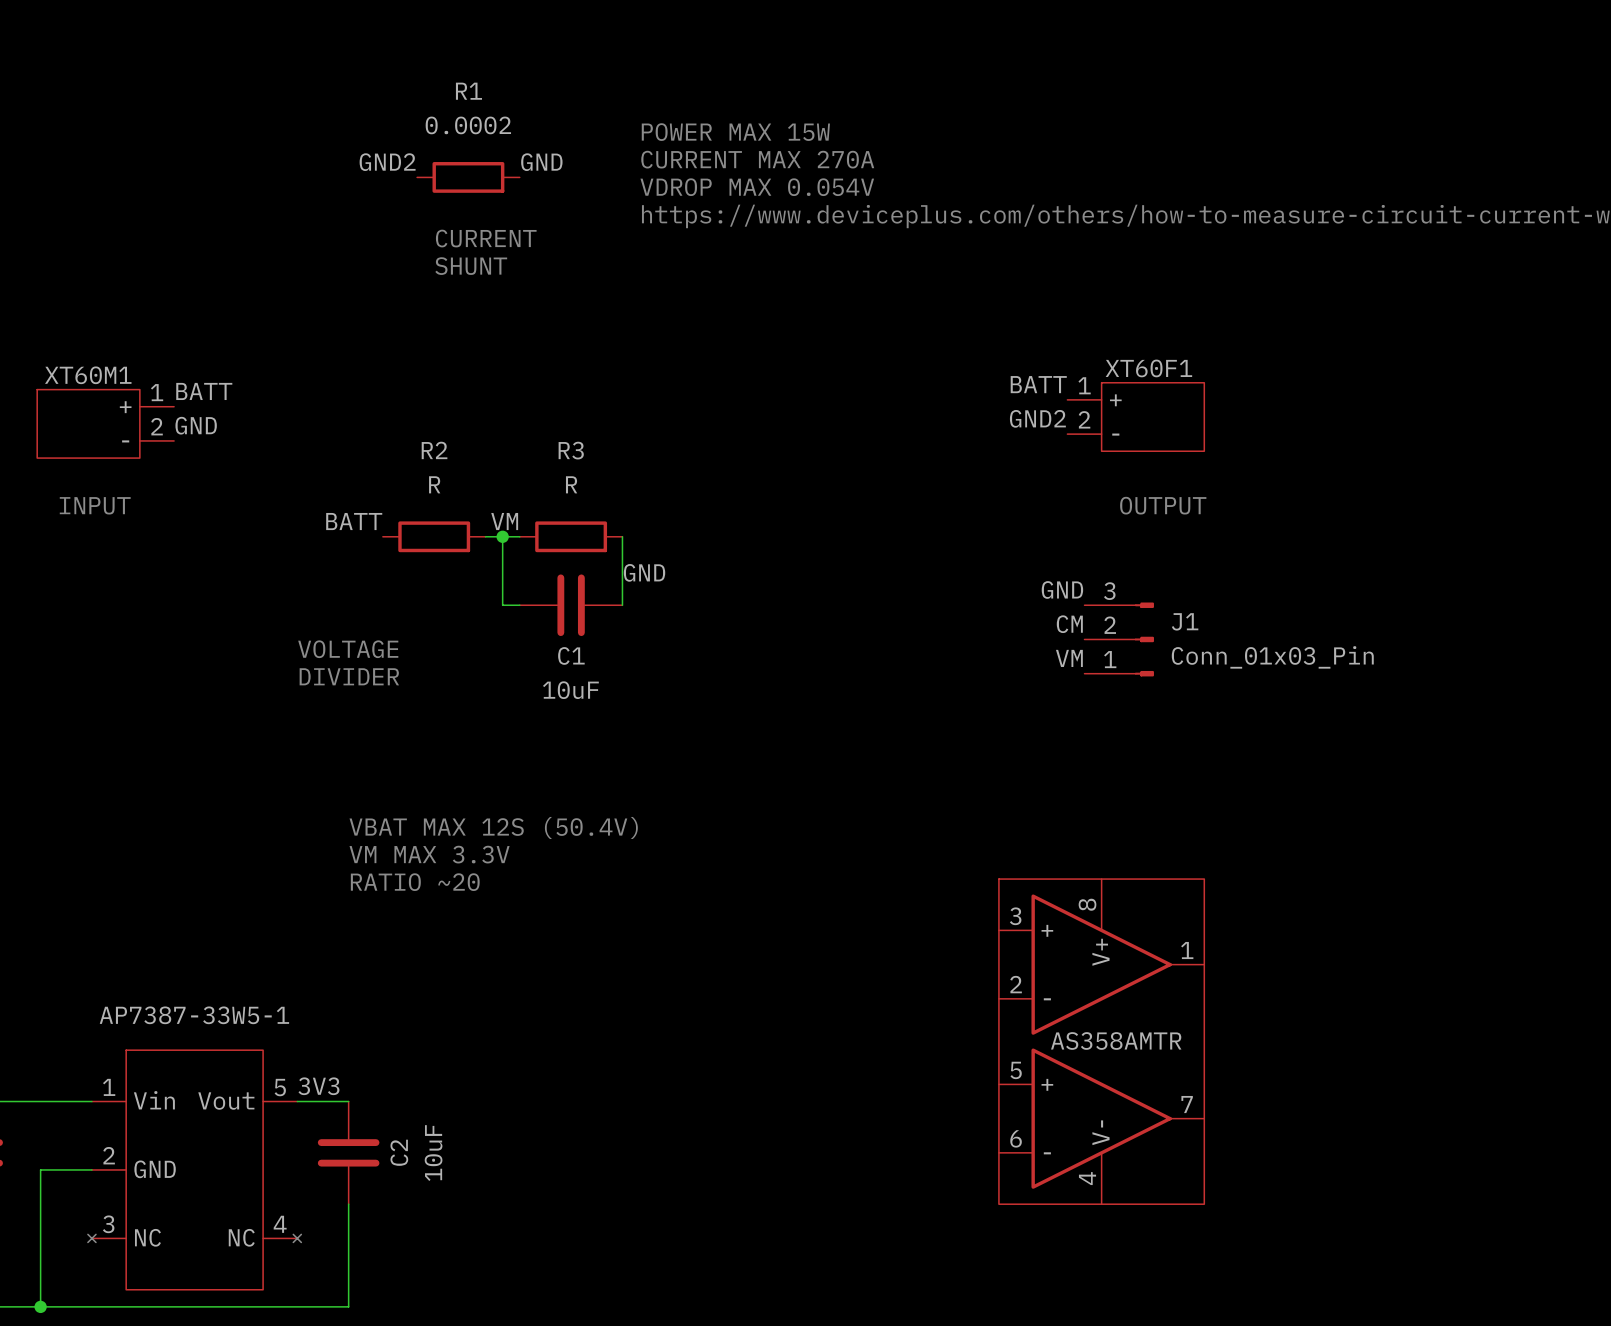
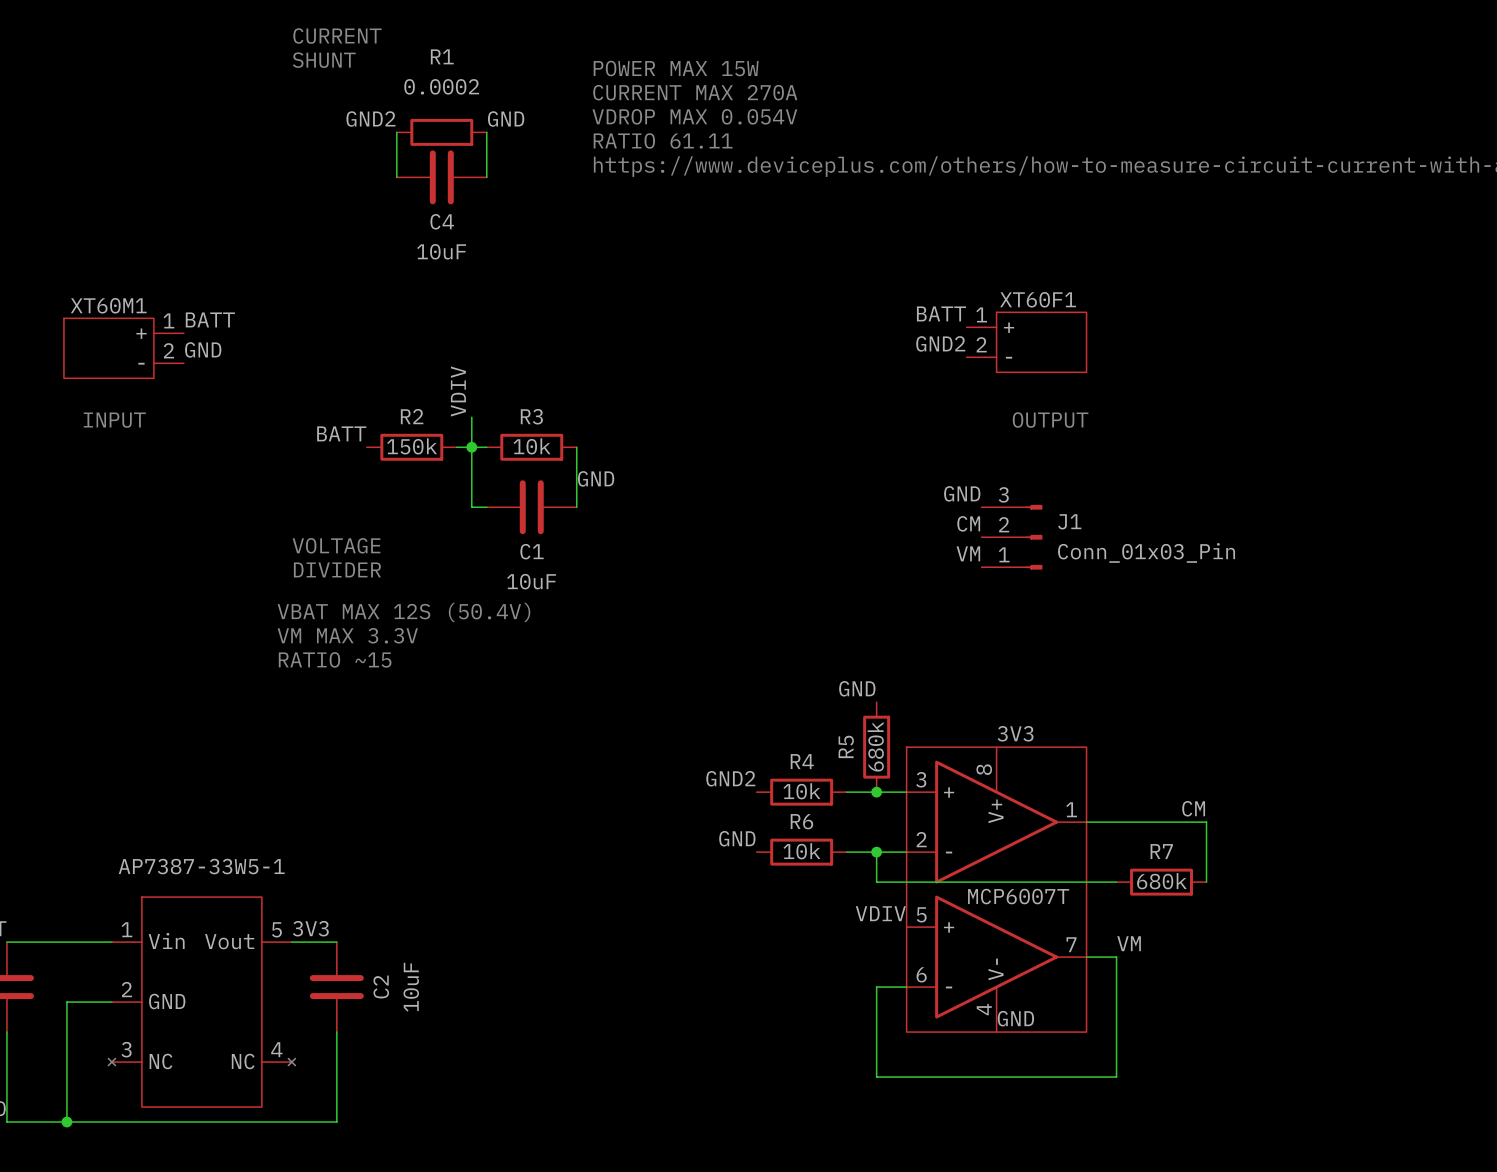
text: none -> POWER MAX 15W (676, 68)
text: POWER MAX 15W (735, 132) -> CURRENT MAX 270A (695, 92)
text: CURRENT MAX 270A (757, 159) -> VDROP MAX 0.054V (694, 116)
wire: none -> (396, 132) (396, 177)
wire: none -> (486, 132) (486, 177)
text: VDROP MAX 0.054V (757, 187) -> RATIO 61.11 (663, 140)
C4: none -> 10uF (441, 177)
text position: CURRENT (486, 238) -> CURRENT (337, 35)
text position: SHUNT (471, 266) -> SHUNT (324, 60)
R2 name position: R2 (434, 450) -> R2 (412, 416)
R3 name position: R3 (571, 450) -> R3 (531, 416)
label: none -> VDIV (458, 391)
R2 value: R (434, 484) -> 150k (412, 446)
R3 value: R (571, 484) -> 10k (532, 446)
wire: none -> (471, 417) (471, 447)
label: VM (504, 521) -> none
text: none -> RATIO ~15 (335, 659)
label: none -> GND (857, 688)
text position: VBAT MAX 12S (50.4V) (493, 827) -> VBAT MAX 12S (50.4V) (403, 612)
text position: VM MAX 3.3V (429, 854) -> VM MAX 3.3V (347, 635)
label: none -> 3V3 (1015, 733)
R5: none -> 680k (876, 747)
text: RATIO ~20 (415, 882) -> none
label: none -> GND2 (730, 778)
R4: none -> 10k (801, 792)
wire: none -> (846, 792) (906, 792)
junction: none -> (876, 792)
label: none -> CM (1193, 808)
wire: none -> (1086, 822) (1206, 822) (1206, 882)
label: none -> GND (737, 838)
R6: none -> 10k (801, 852)
wire: none -> (846, 852) (906, 852)
wire: none -> (876, 852) (876, 882) (1116, 882)
junction: none -> (876, 852)
R7: none -> 680k (1161, 882)
AS358AMTR name: AS358AMTR (1116, 1040) -> MCP6007T (1018, 896)
label: none -> VDIV (880, 913)
label: none -> VM (1129, 943)
wire: none -> (1086, 957) (1116, 957) (1116, 1077) (876, 1077) (876, 987) (906, 987)
label: none -> GND (1015, 1018)

